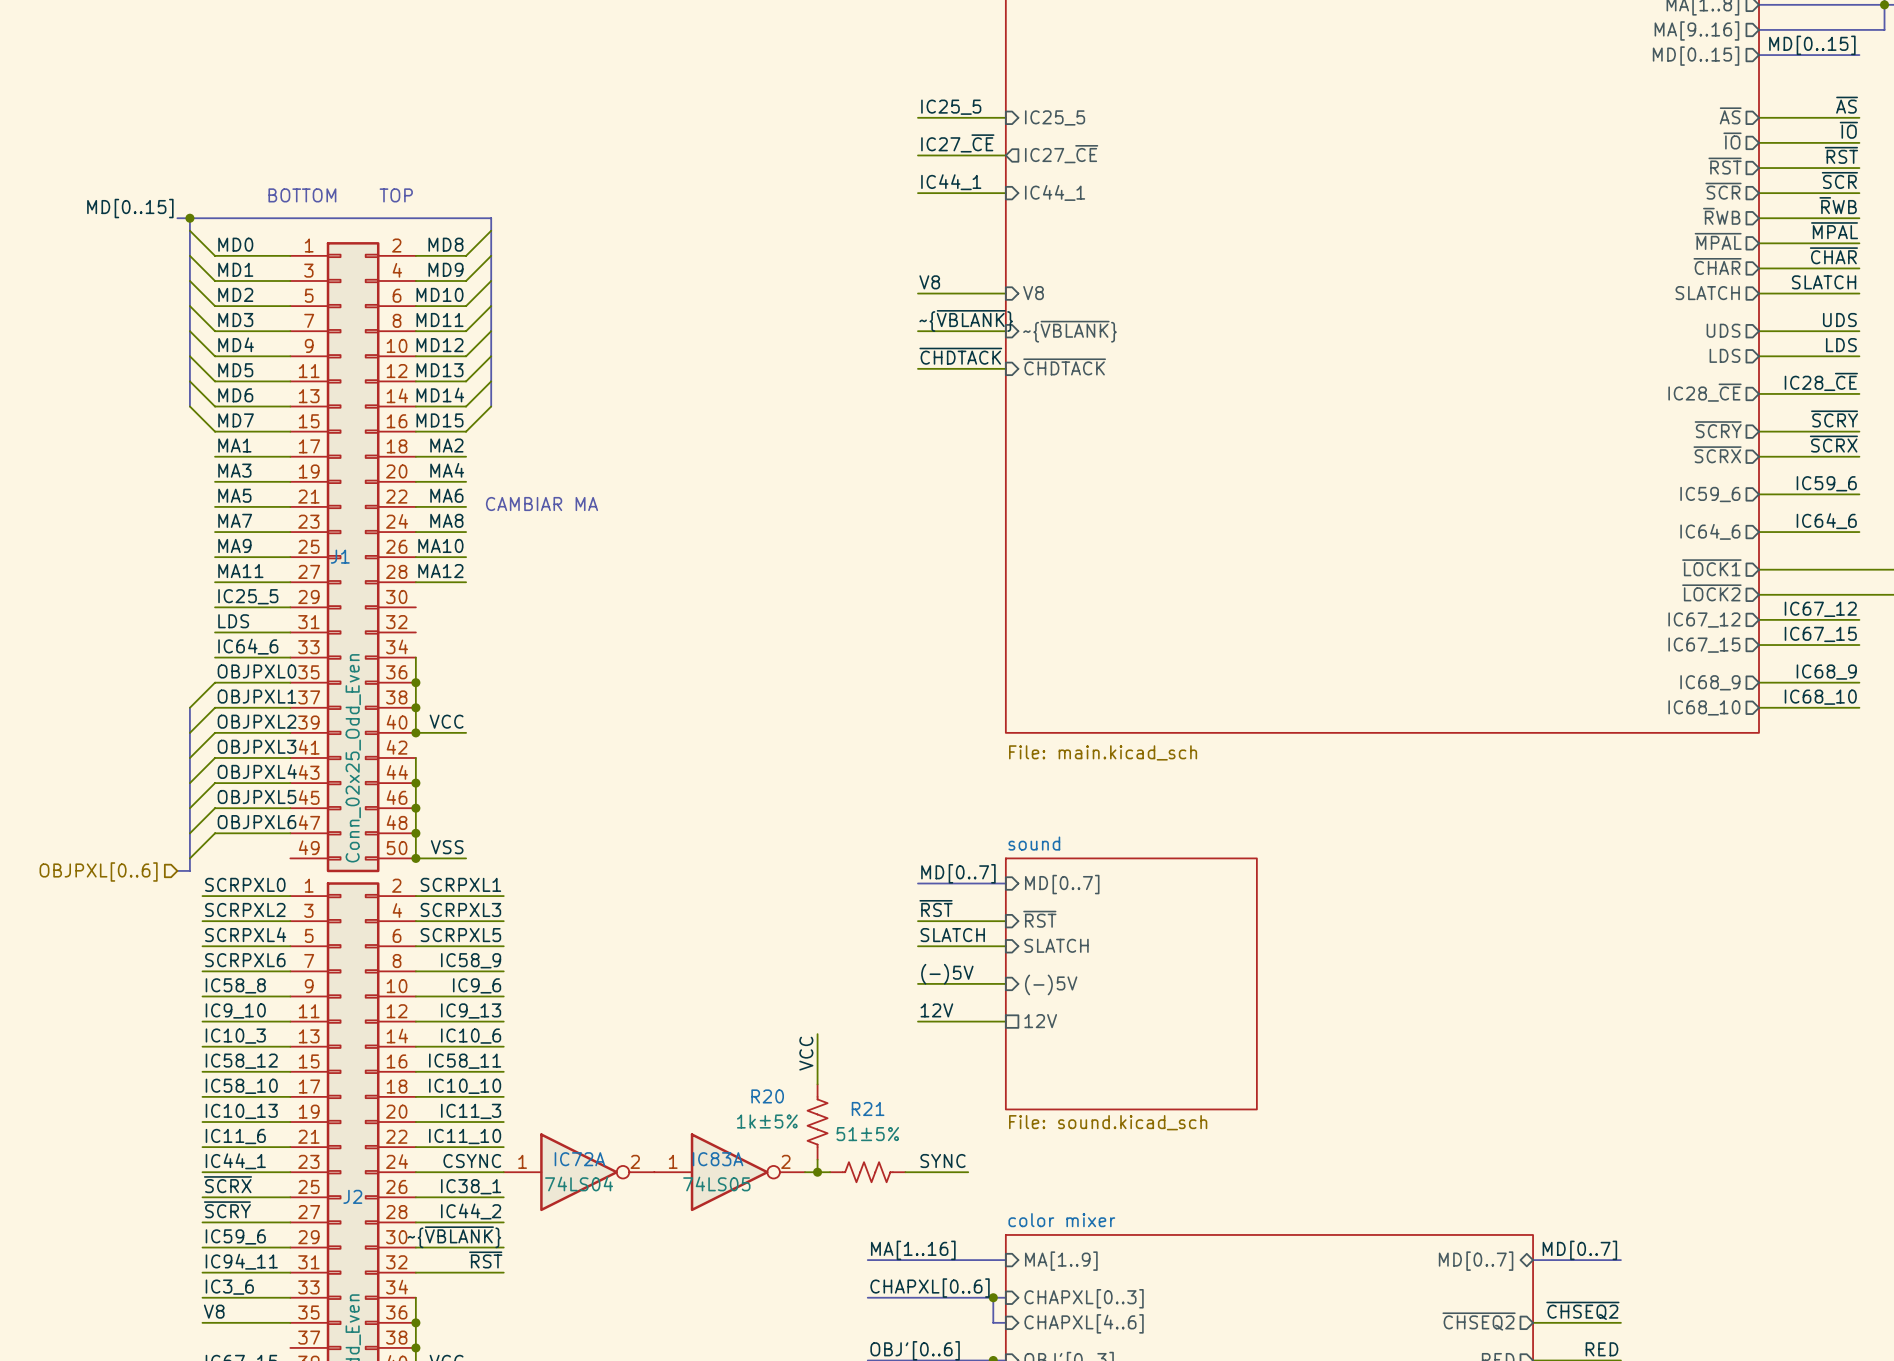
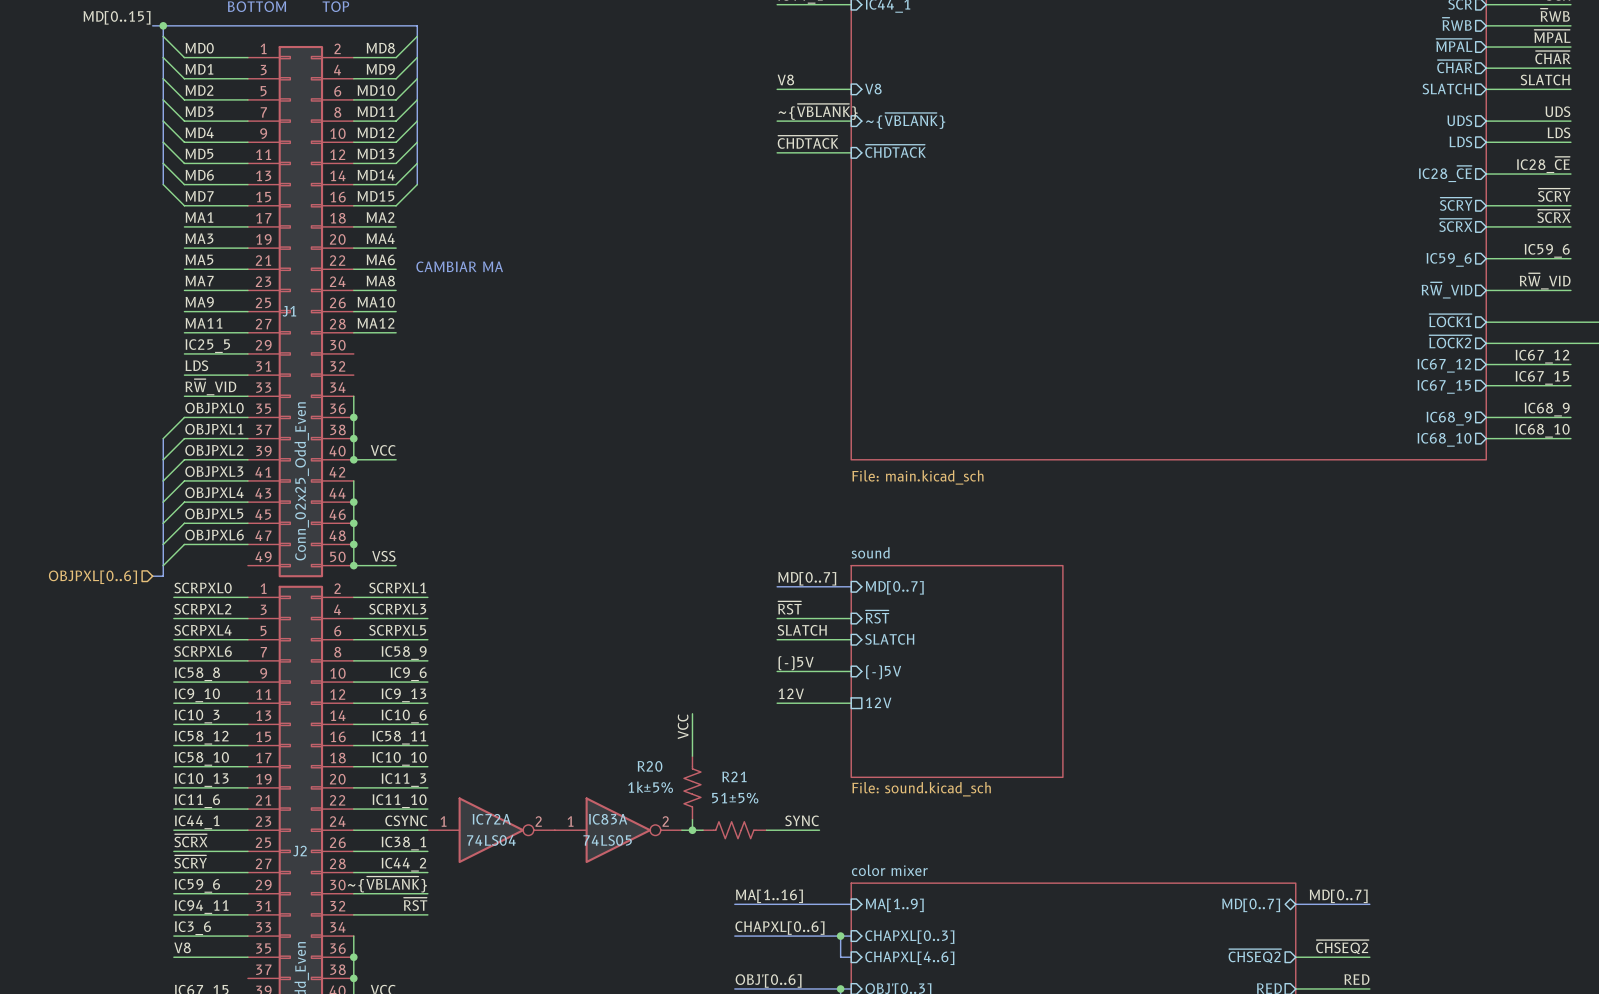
label: IC64_6 (1826, 521) -> R~{W}_VID (1545, 281)
sheet pin: IC64_6 (1710, 531) -> R~{W}_VID (1447, 290)
label: IC64_6 (248, 646) -> R~{W}_VID (210, 387)

